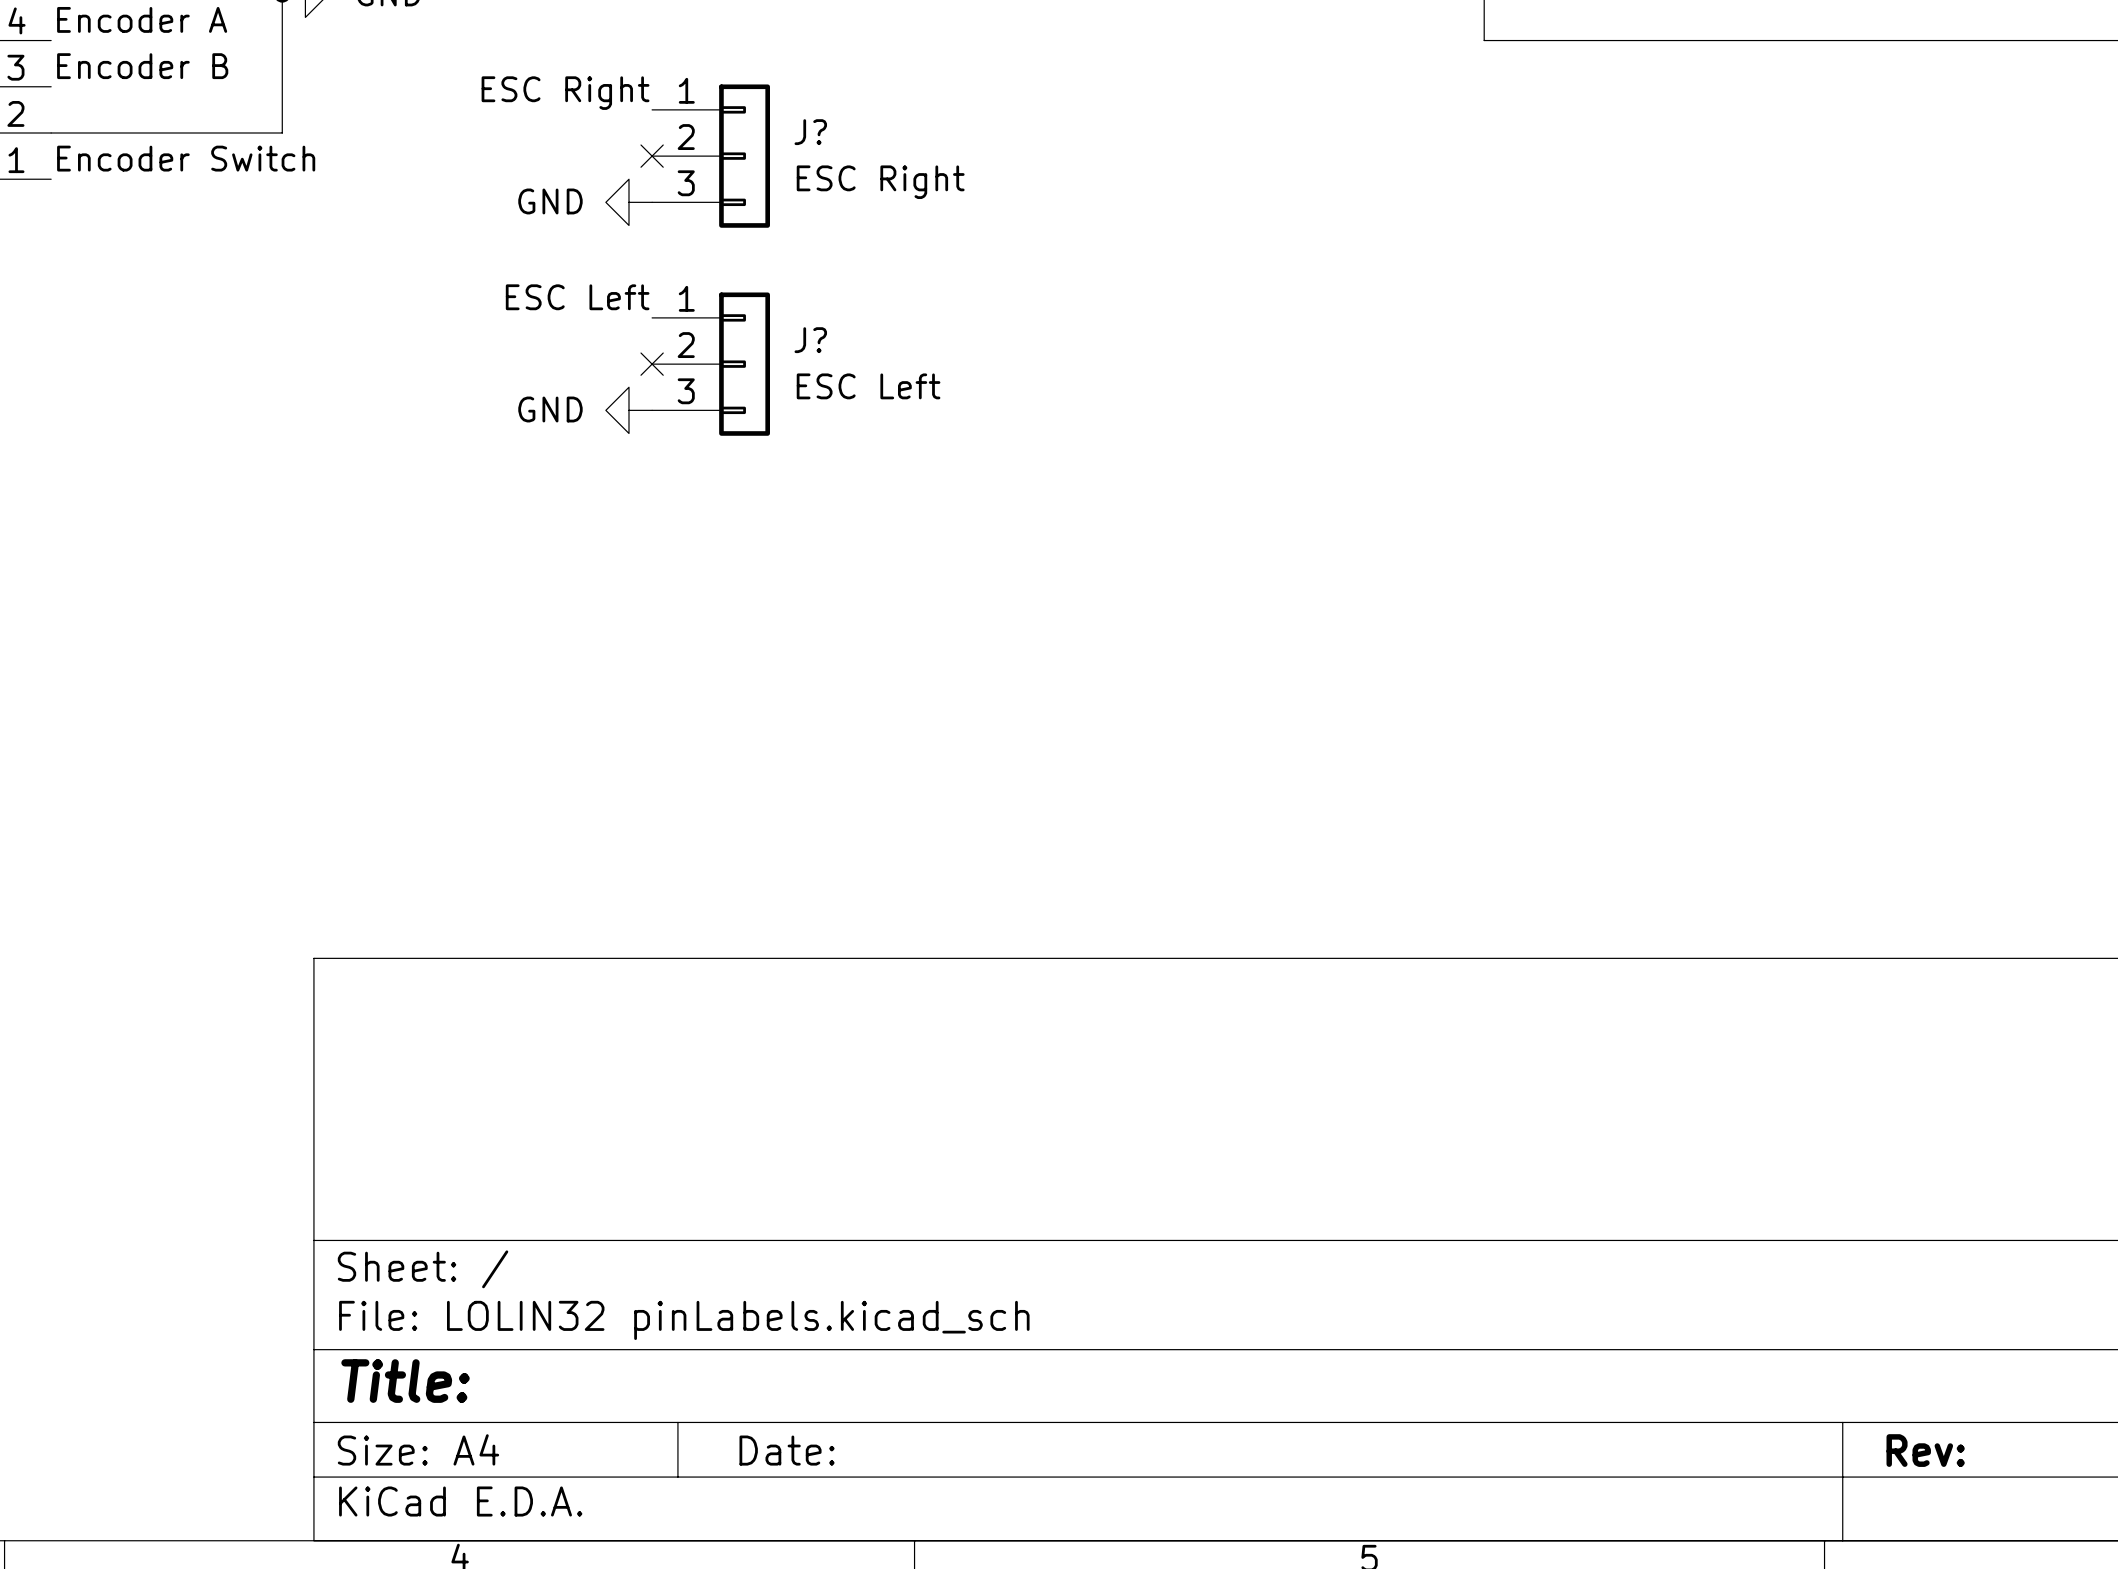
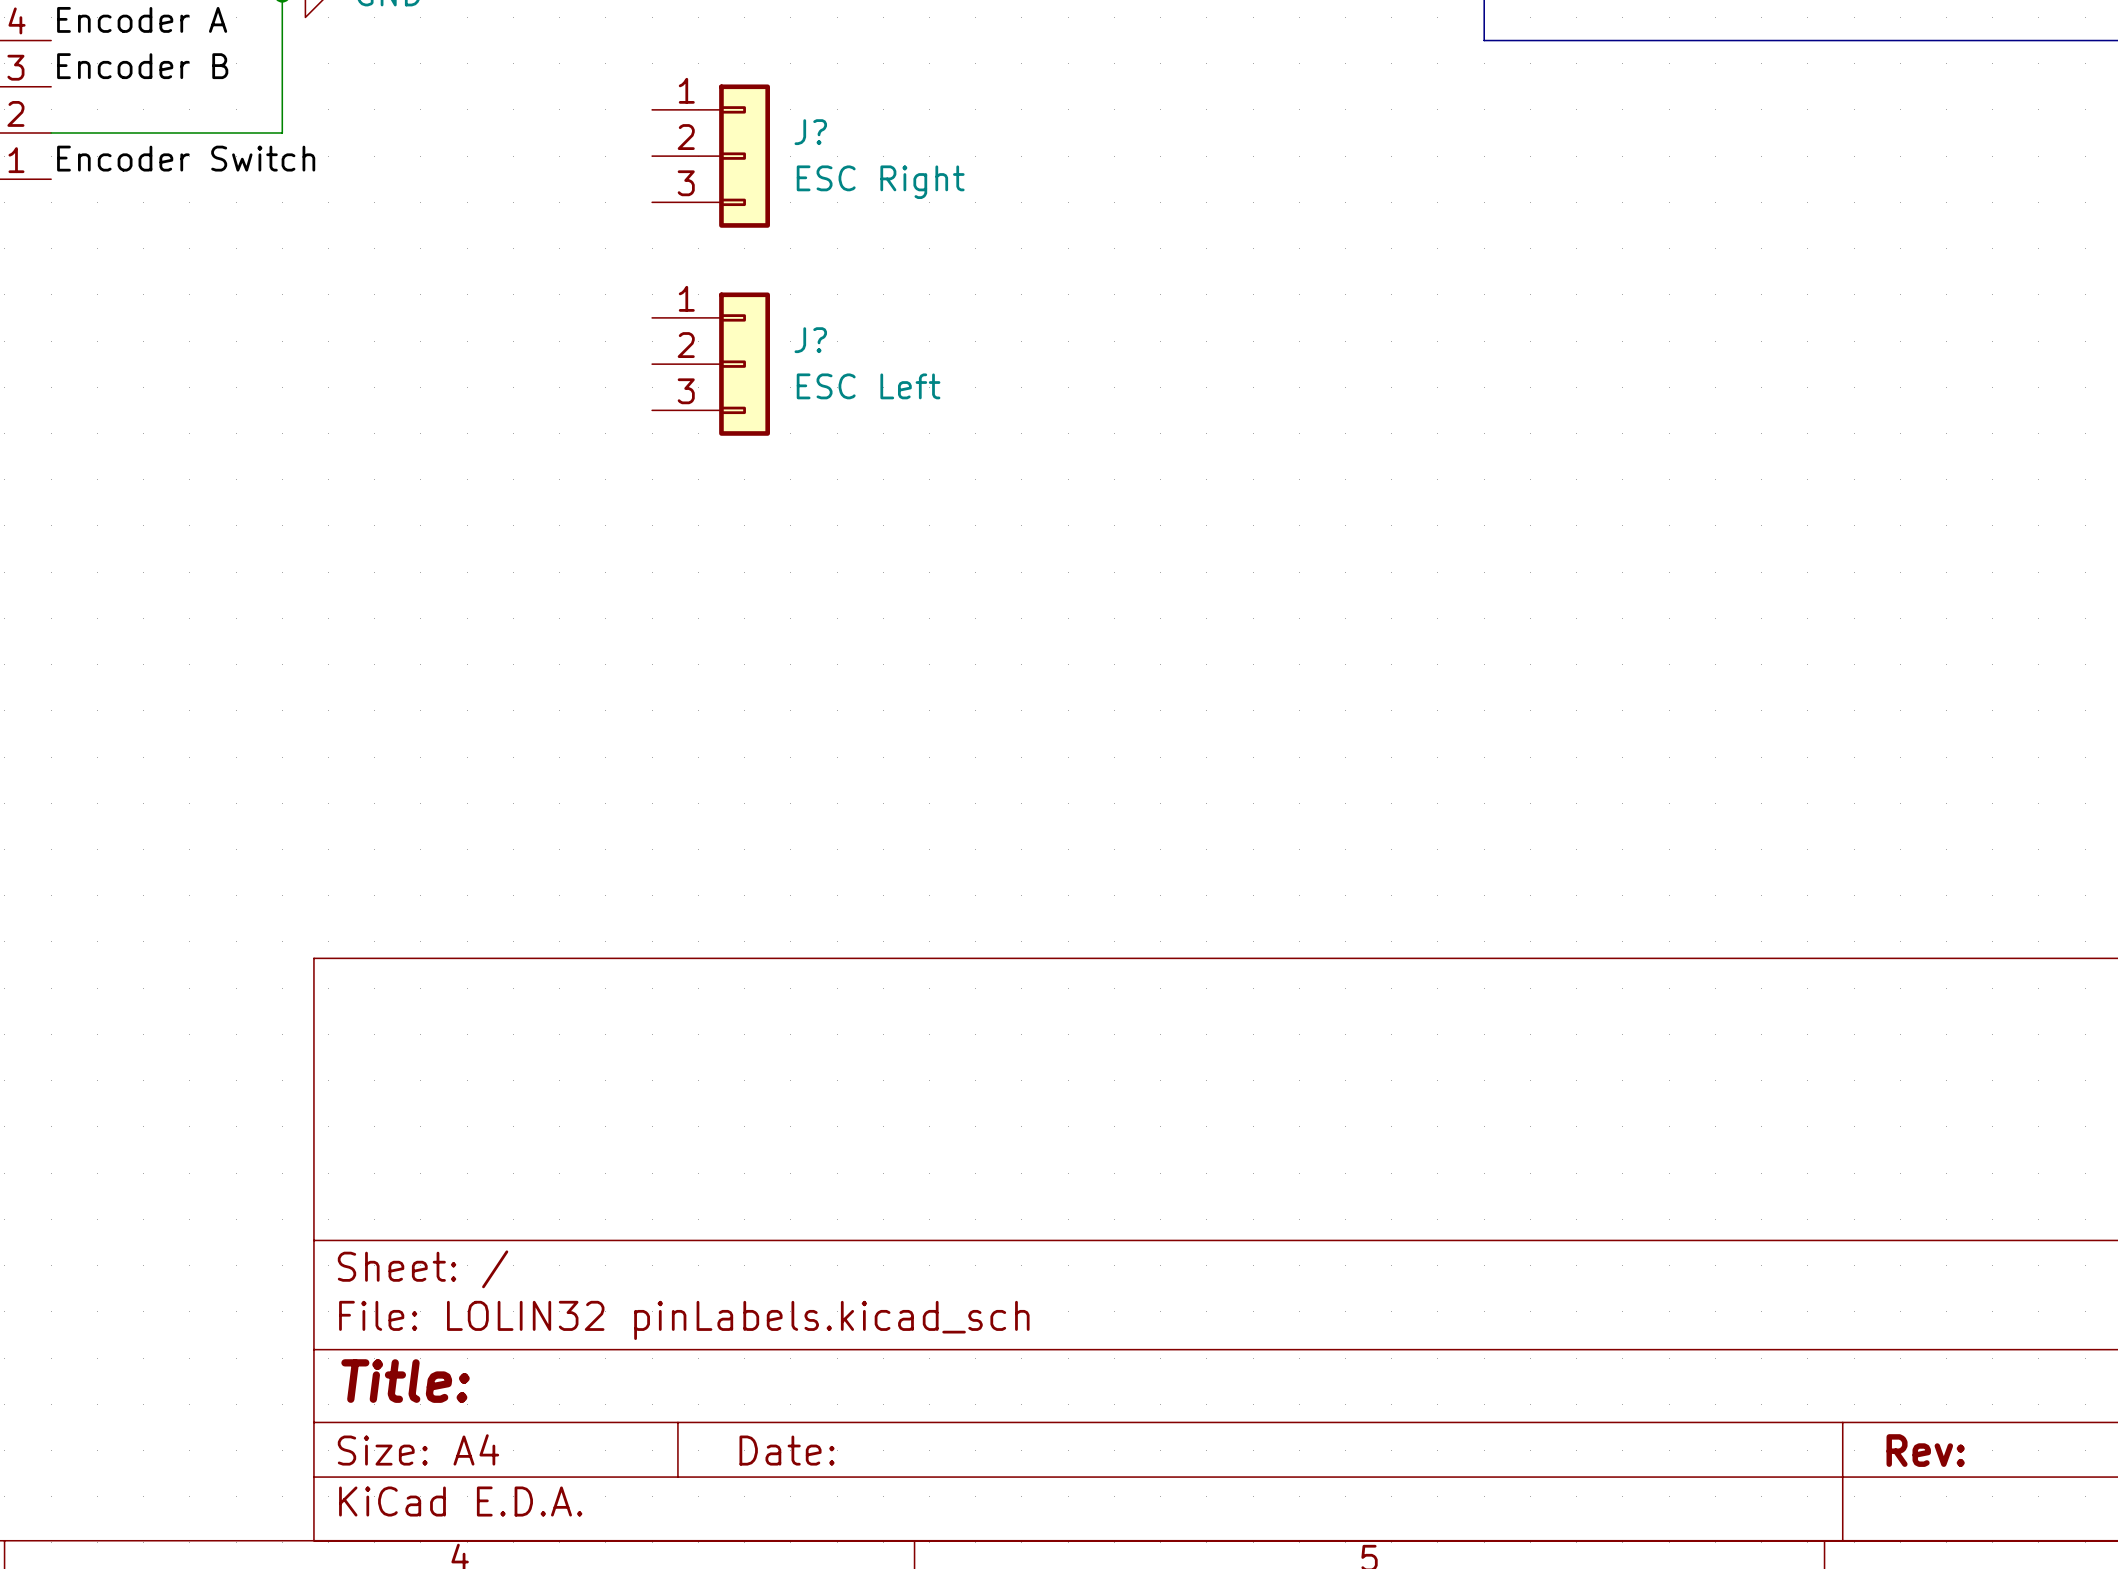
label: ESC Right (565, 93) -> none
no-connect mark: (652, 156) -> none
power symbol: GND (628, 202) -> none
label: ESC Left (577, 297) -> none
no-connect mark: (652, 364) -> none
power symbol: GND (628, 410) -> none

